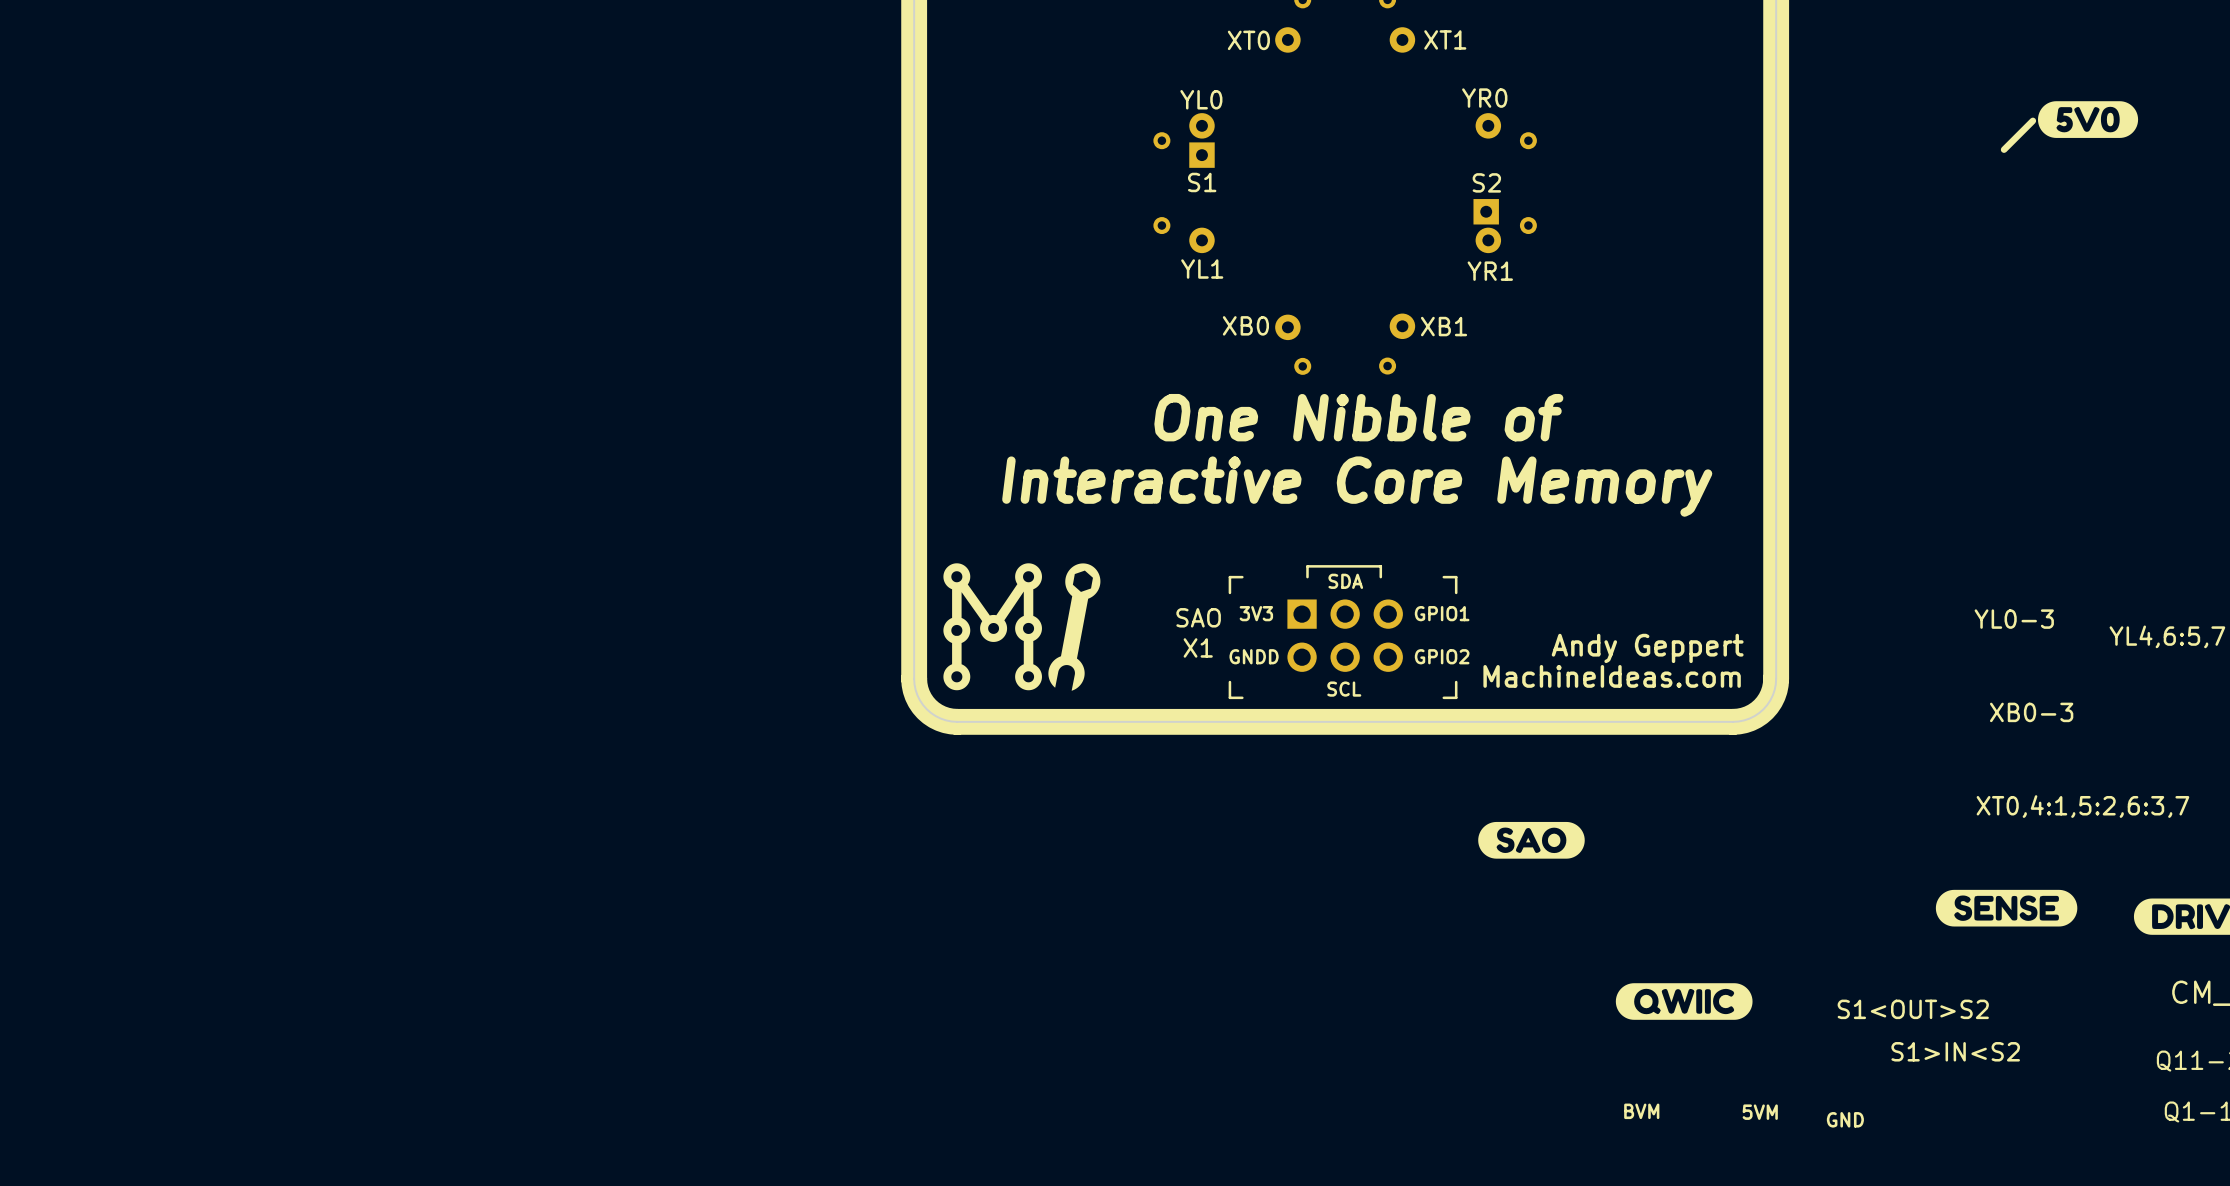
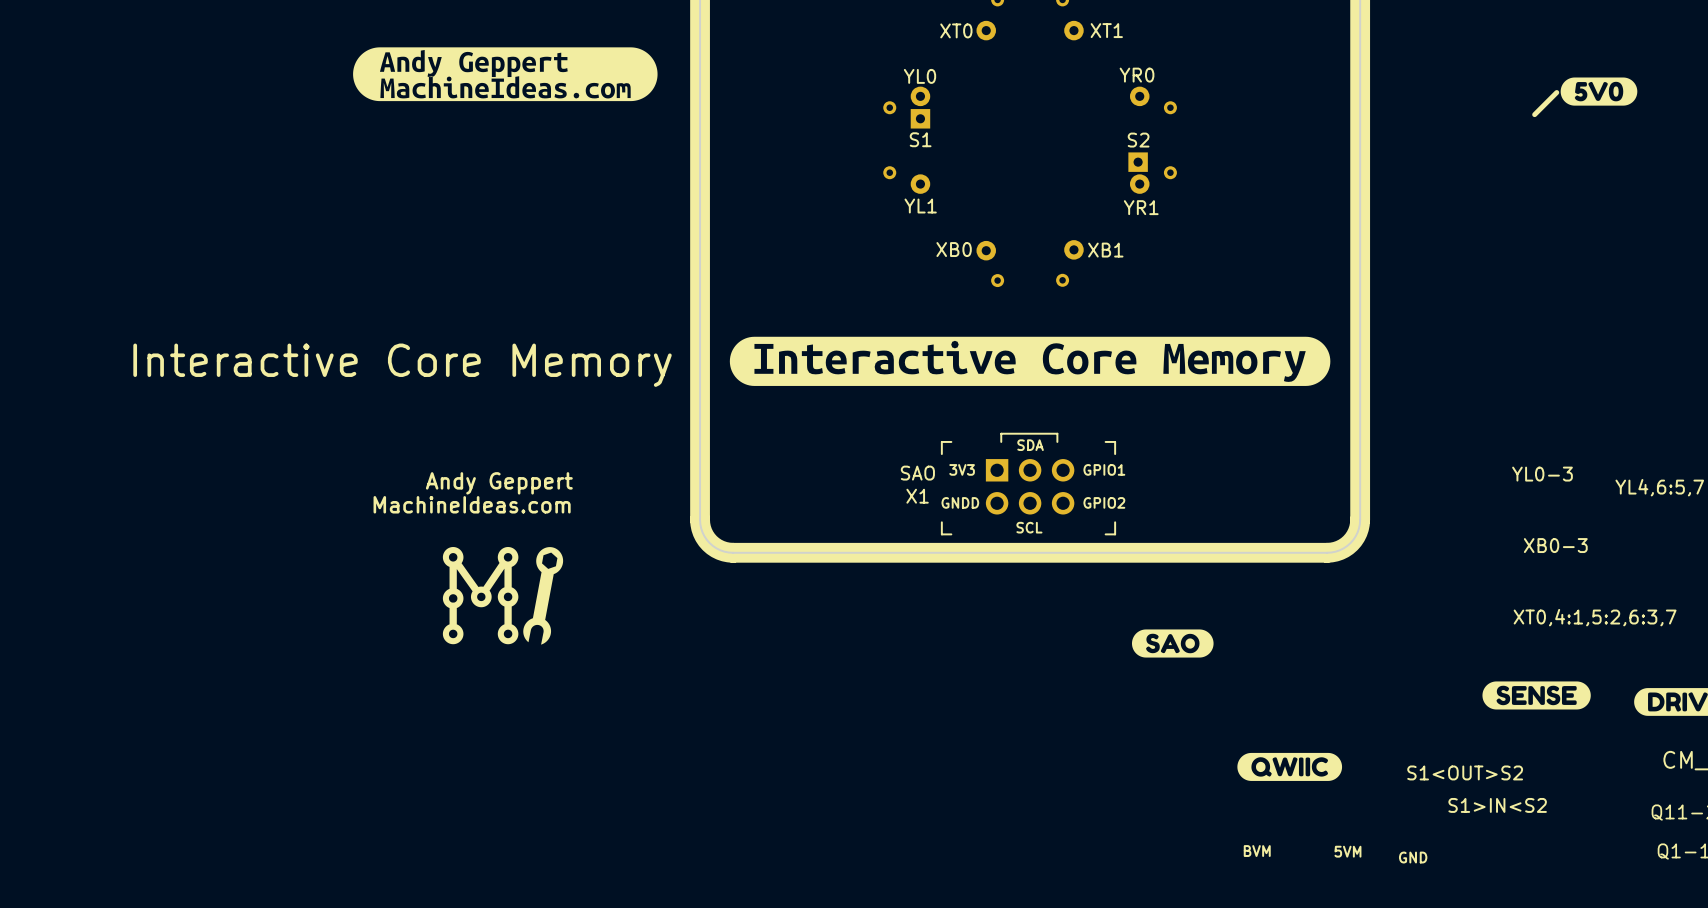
drawing: none -> [353, 47, 658, 102]
text: One Nibble of (1358, 417) -> none
drawing: none -> [729, 336, 1331, 386]
text: none -> Interactive Core Memory (402, 365)
text: Interactive Core Memory (1357, 486) -> none
drawing position: (1021, 627) -> (503, 595)
text: none -> Andy Geppert (499, 483)
text: Andy Geppert (1647, 648) -> none
text: none -> MachineIdeas.com (472, 504)
text: MachineIdeas.com (1612, 676) -> none

